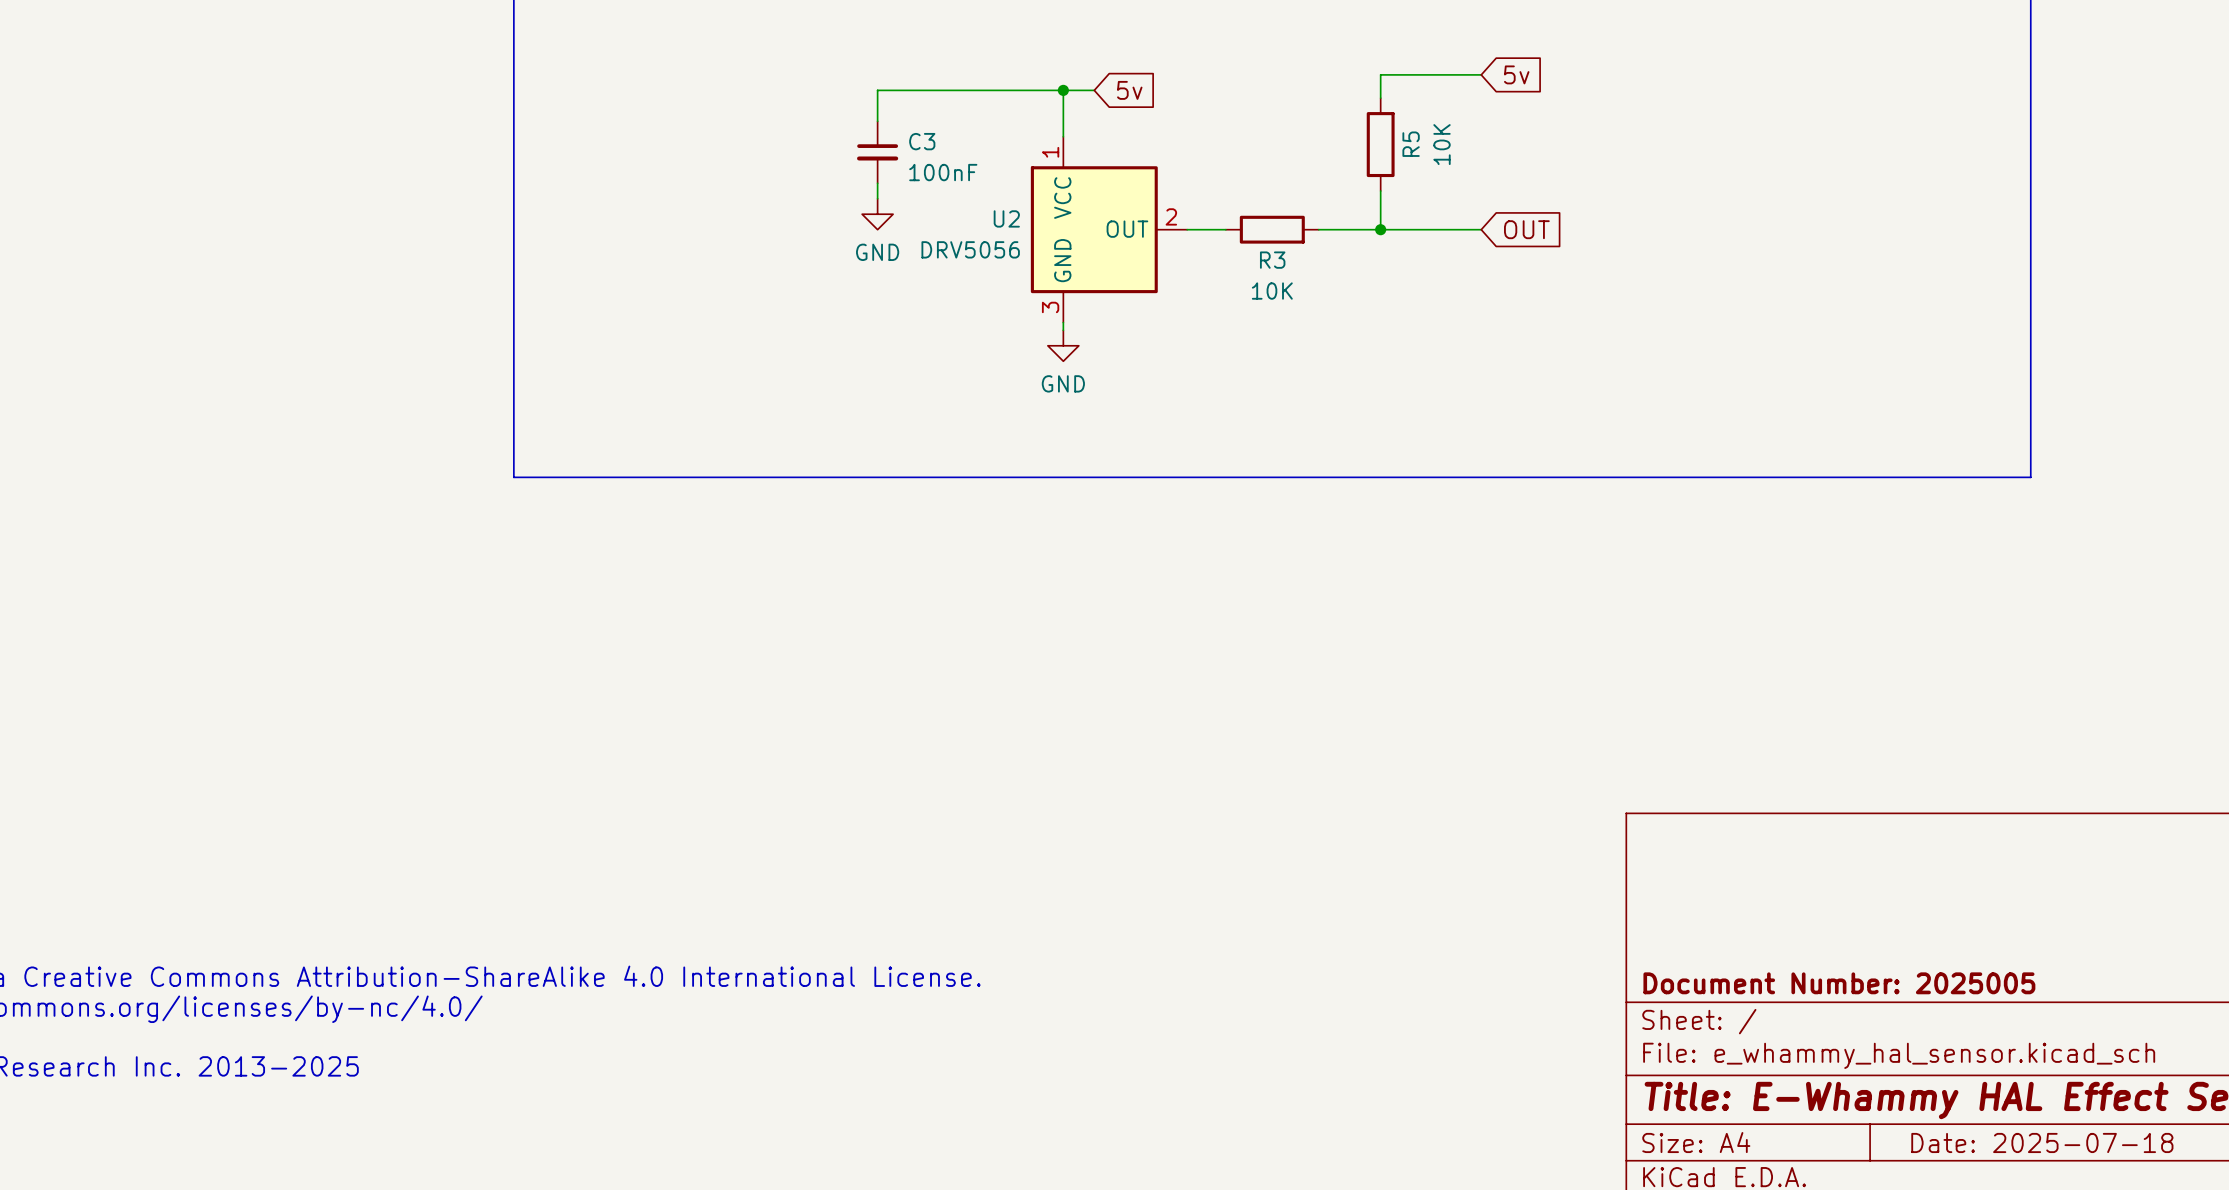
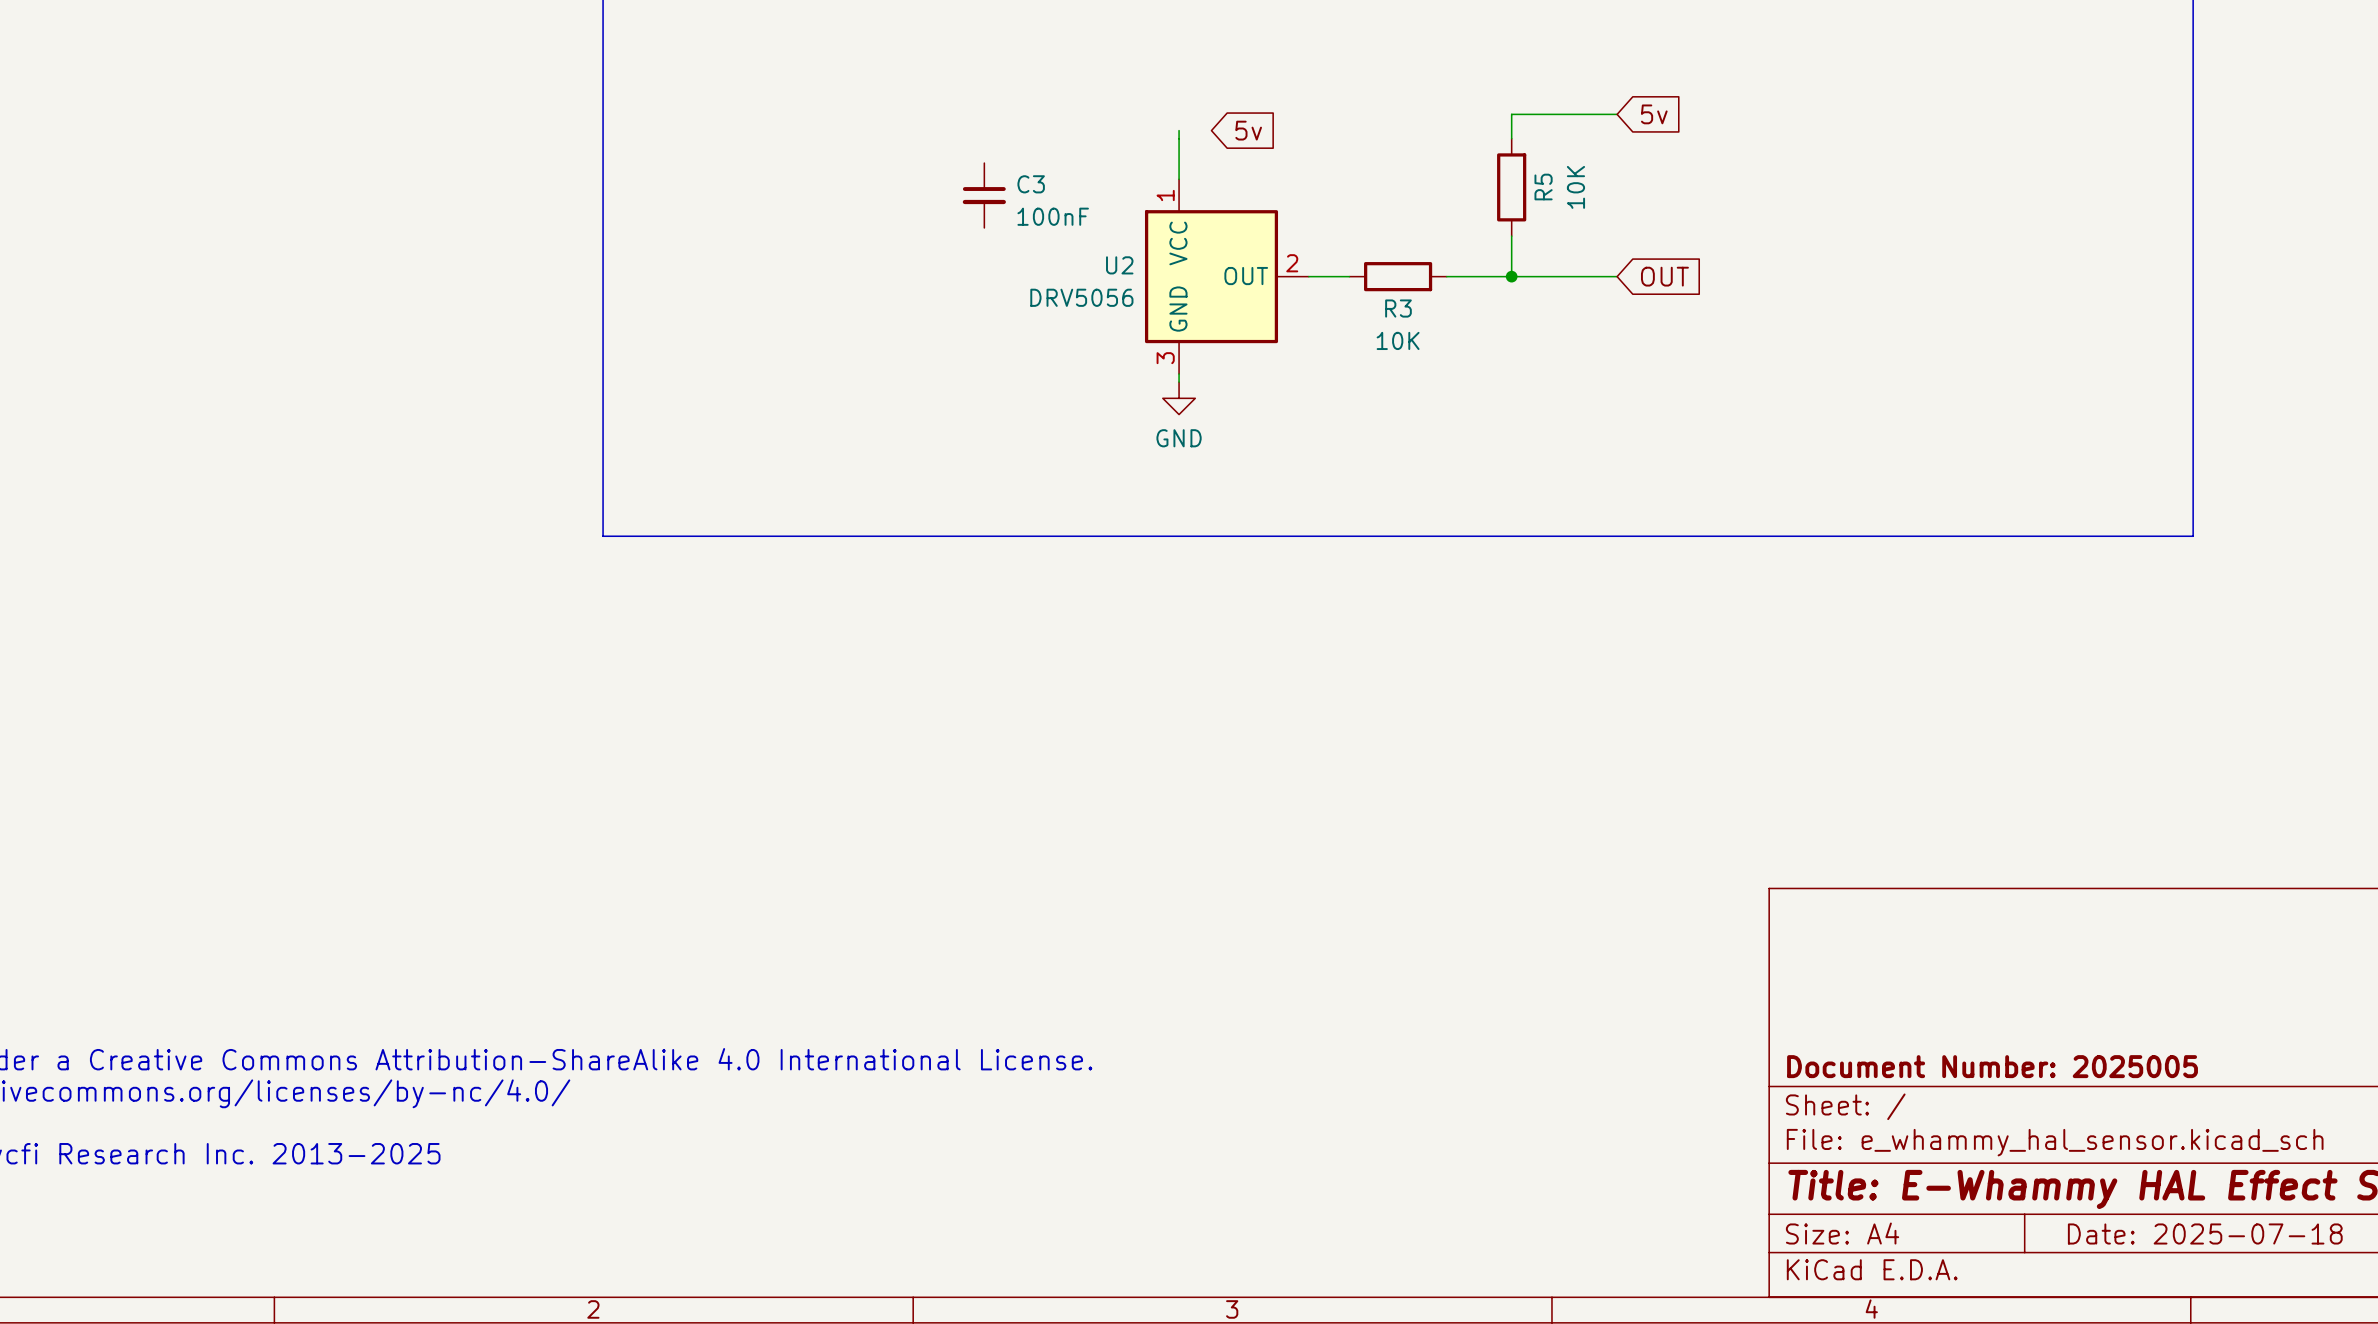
junction: (1063, 90) -> none
wire: (1094, 90) (877, 90) (877, 121) -> none
wire: (877, 183) (877, 198) -> none
power symbol: GND (877, 214) -> none

